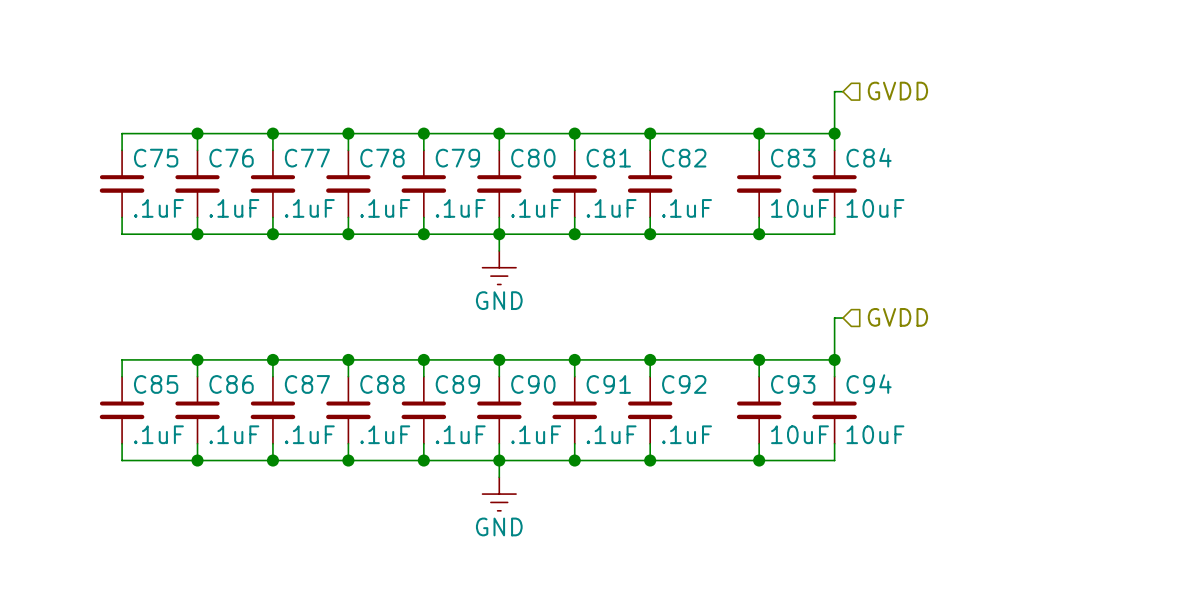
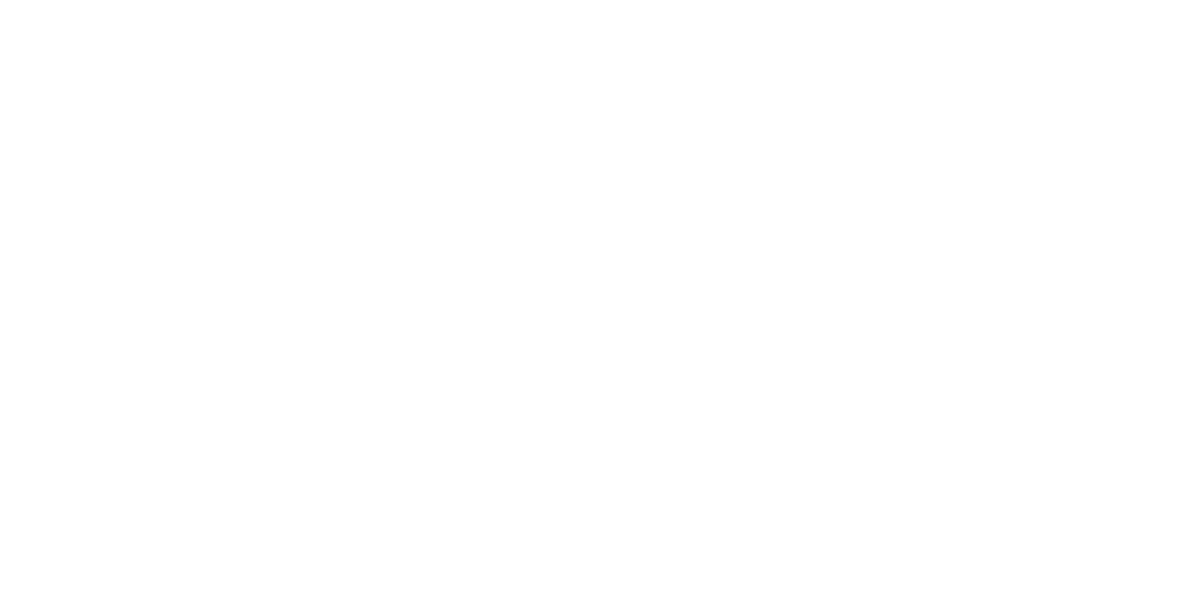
wire: (842, 91) (834, 91) (834, 150) -> none
hierarchical label: GVDD (897, 91) -> none
wire: (197, 133) (197, 150) -> none
junction: (197, 133) -> none
wire: (272, 133) (272, 150) -> none
junction: (272, 133) -> none
wire: (348, 133) (348, 150) -> none
junction: (348, 133) -> none
wire: (423, 133) (423, 150) -> none
junction: (423, 133) -> none
wire: (499, 133) (499, 150) -> none
junction: (499, 133) -> none
wire: (574, 133) (574, 150) -> none
junction: (574, 133) -> none
wire: (650, 133) (650, 150) -> none
junction: (650, 133) -> none
wire: (759, 133) (759, 150) -> none
junction: (759, 133) -> none
wire: (834, 133) (122, 133) (122, 150) -> none
junction: (834, 133) -> none
C75: .1uF (122, 183) -> none
C76: .1uF (197, 183) -> none
C77: .1uF (272, 183) -> none
C78: .1uF (348, 183) -> none
C79: .1uF (423, 183) -> none
C80: .1uF (499, 183) -> none
C81: .1uF (574, 183) -> none
C82: .1uF (650, 183) -> none
C83: 10uF (759, 183) -> none
C84: 10uF (834, 183) -> none
wire: (122, 217) (122, 234) (834, 234) (834, 217) -> none
wire: (197, 217) (197, 234) -> none
wire: (272, 217) (272, 234) -> none
wire: (348, 217) (348, 234) -> none
wire: (423, 217) (423, 234) -> none
wire: (499, 217) (499, 250) -> none
wire: (574, 217) (574, 234) -> none
wire: (650, 217) (650, 234) -> none
wire: (759, 217) (759, 234) -> none
junction: (197, 234) -> none
junction: (272, 234) -> none
junction: (348, 234) -> none
junction: (423, 234) -> none
junction: (499, 234) -> none
junction: (574, 234) -> none
junction: (650, 234) -> none
junction: (759, 234) -> none
power symbol: GND (499, 267) -> none
hierarchical label: GVDD (897, 317) -> none
wire: (842, 318) (834, 318) (834, 376) -> none
wire: (197, 359) (197, 376) -> none
junction: (197, 359) -> none
wire: (272, 359) (272, 376) -> none
junction: (272, 359) -> none
wire: (348, 359) (348, 376) -> none
junction: (348, 359) -> none
wire: (423, 359) (423, 376) -> none
junction: (423, 359) -> none
wire: (499, 359) (499, 376) -> none
junction: (499, 359) -> none
wire: (574, 359) (574, 376) -> none
junction: (574, 359) -> none
wire: (650, 359) (650, 376) -> none
junction: (650, 359) -> none
wire: (759, 359) (759, 376) -> none
junction: (759, 359) -> none
wire: (834, 359) (122, 359) (122, 376) -> none
junction: (834, 359) -> none
C85: .1uF (122, 410) -> none
C86: .1uF (197, 410) -> none
C87: .1uF (272, 410) -> none
C88: .1uF (348, 410) -> none
C89: .1uF (423, 410) -> none
C90: .1uF (499, 410) -> none
C91: .1uF (574, 410) -> none
C92: .1uF (650, 410) -> none
C93: 10uF (759, 410) -> none
C94: 10uF (834, 410) -> none
wire: (122, 443) (122, 460) (834, 460) (834, 443) -> none
wire: (197, 443) (197, 460) -> none
wire: (272, 443) (272, 460) -> none
wire: (348, 443) (348, 460) -> none
wire: (423, 443) (423, 460) -> none
wire: (499, 443) (499, 477) -> none
wire: (574, 443) (574, 460) -> none
wire: (650, 443) (650, 460) -> none
wire: (759, 443) (759, 460) -> none
junction: (197, 460) -> none
junction: (272, 460) -> none
junction: (348, 460) -> none
junction: (423, 460) -> none
junction: (499, 460) -> none
junction: (574, 460) -> none
junction: (650, 460) -> none
junction: (759, 460) -> none
power symbol: GND (499, 494) -> none

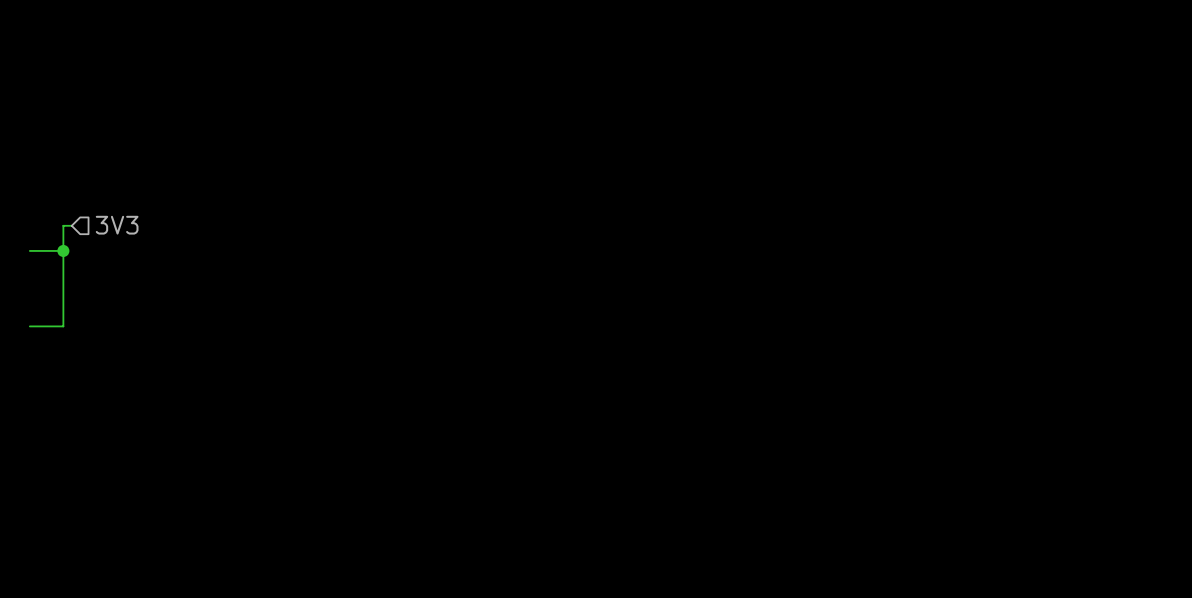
wire: none -> (71, 225) (63, 225) (63, 326) (29, 326)
hierarchical label: none -> 3V3 (117, 225)
wire: none -> (29, 250) (63, 250)
junction: none -> (63, 250)

